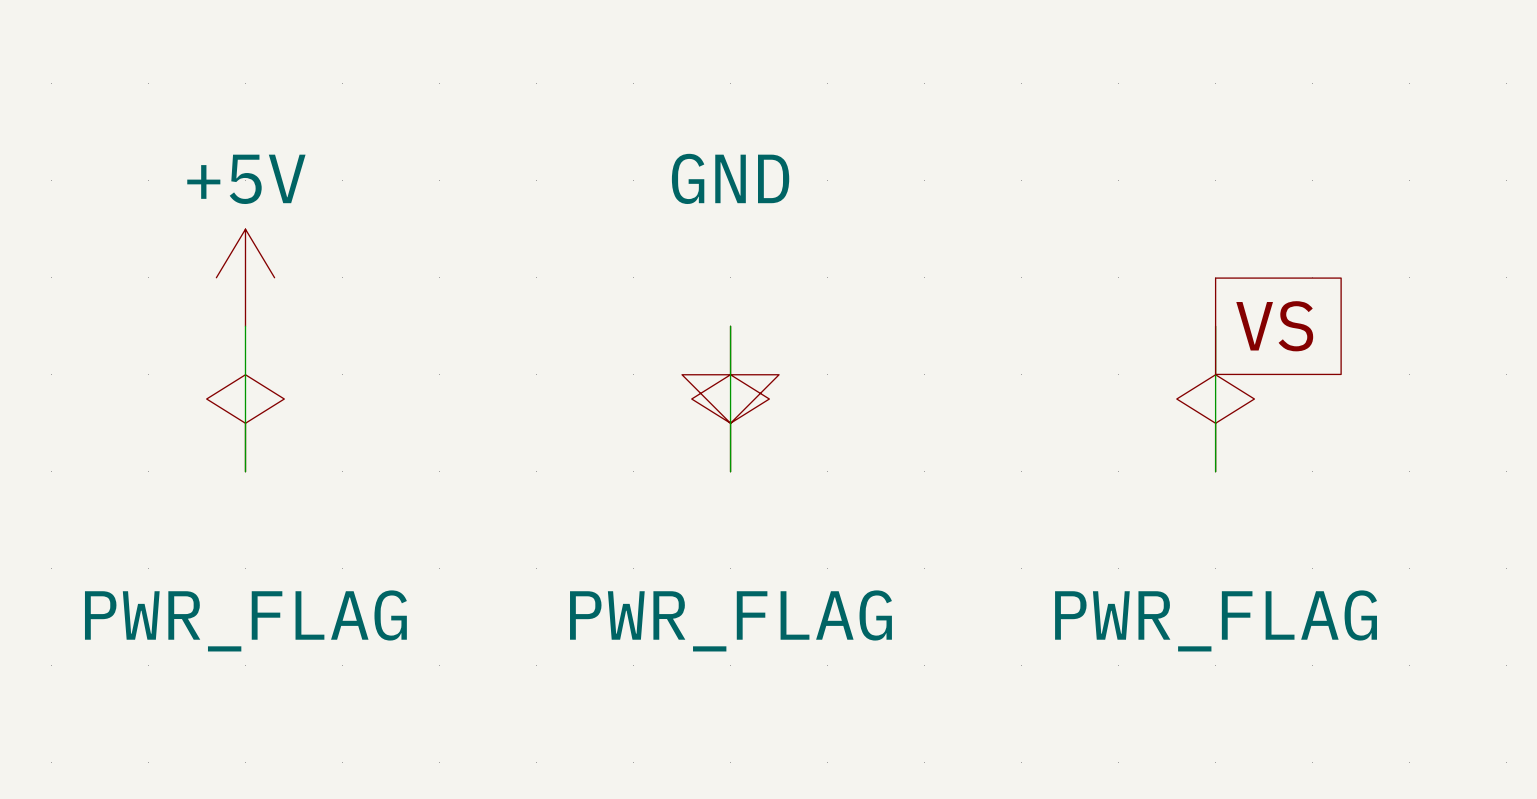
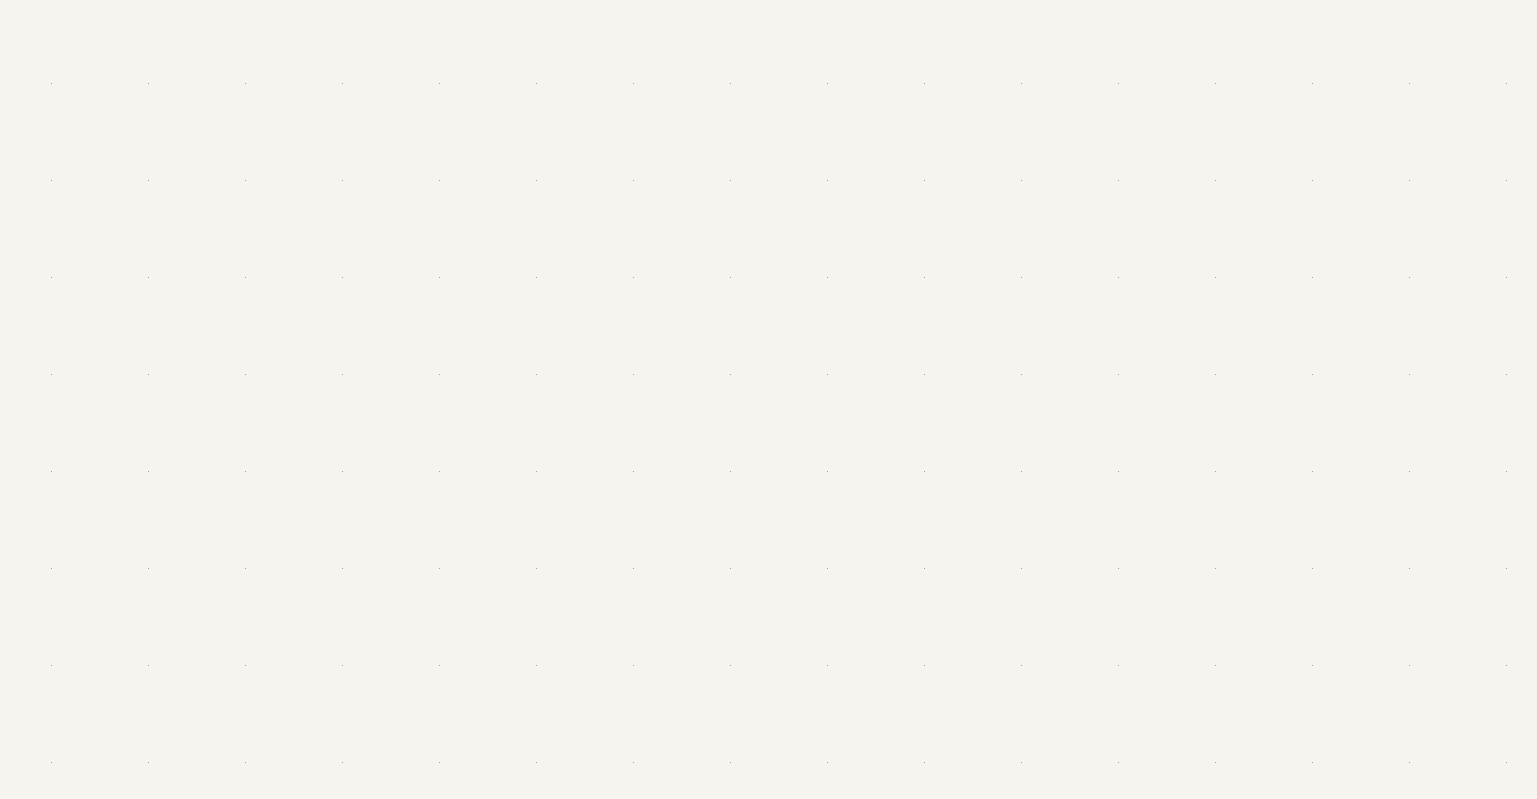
power symbol: +5V (245, 277) -> none
wire: (245, 326) (245, 471) -> none
wire: (730, 326) (730, 471) -> none
wire: (1215, 326) (1215, 471) -> none
global label: VS (1274, 326) -> none
power symbol: GND (730, 374) -> none
power symbol: PWR_FLAG (245, 423) -> none
power symbol: PWR_FLAG (730, 423) -> none
power symbol: PWR_FLAG (1215, 423) -> none

